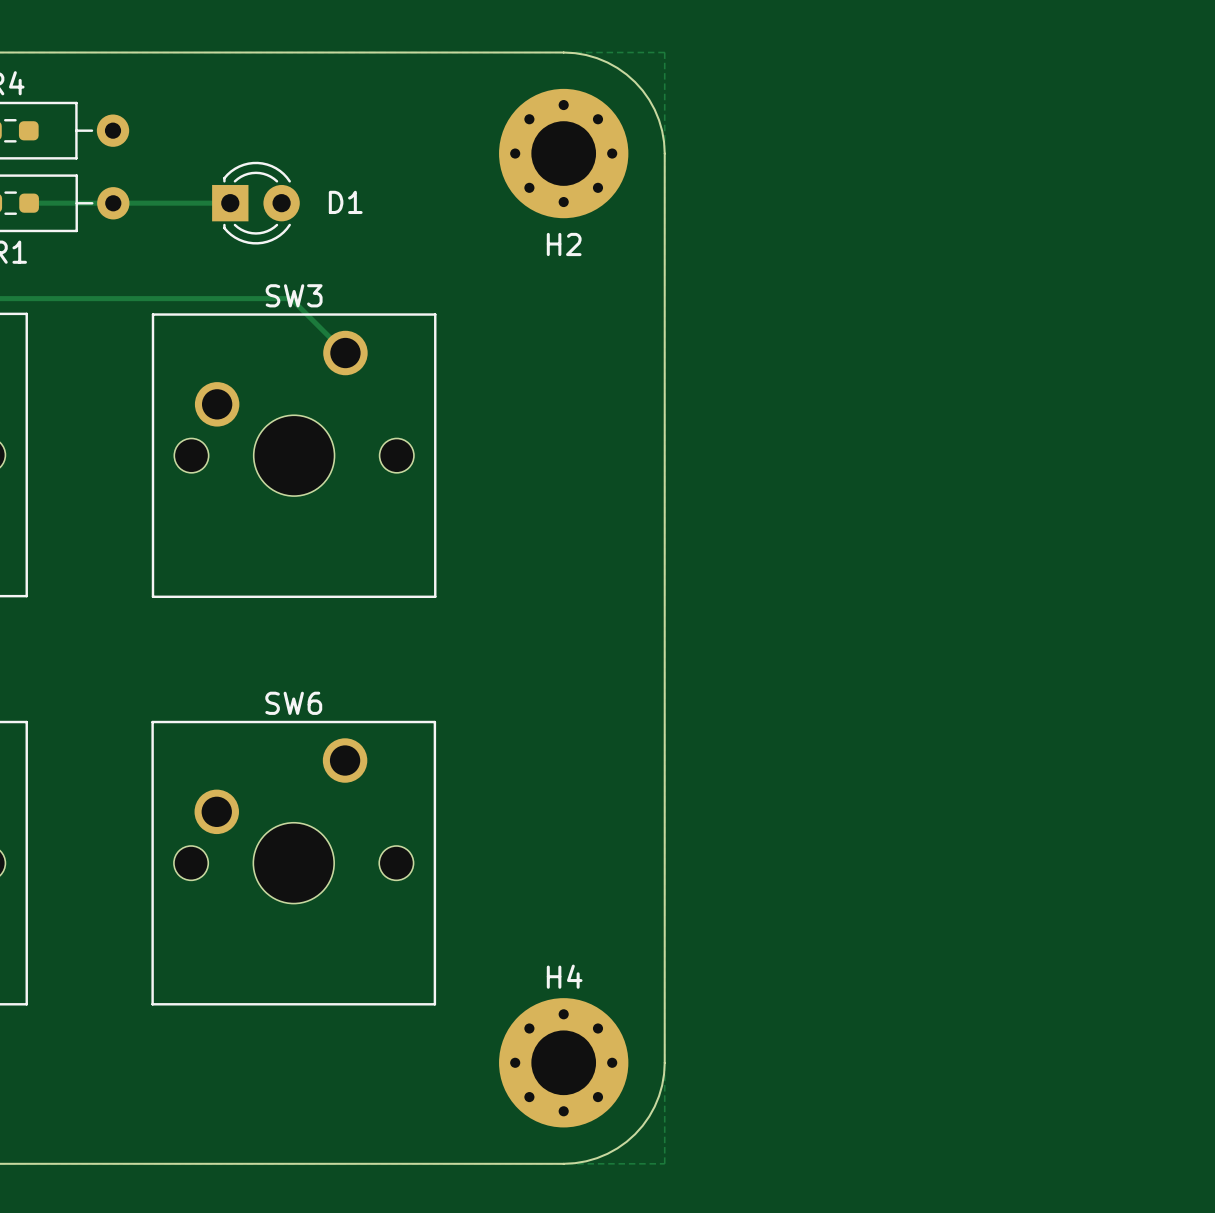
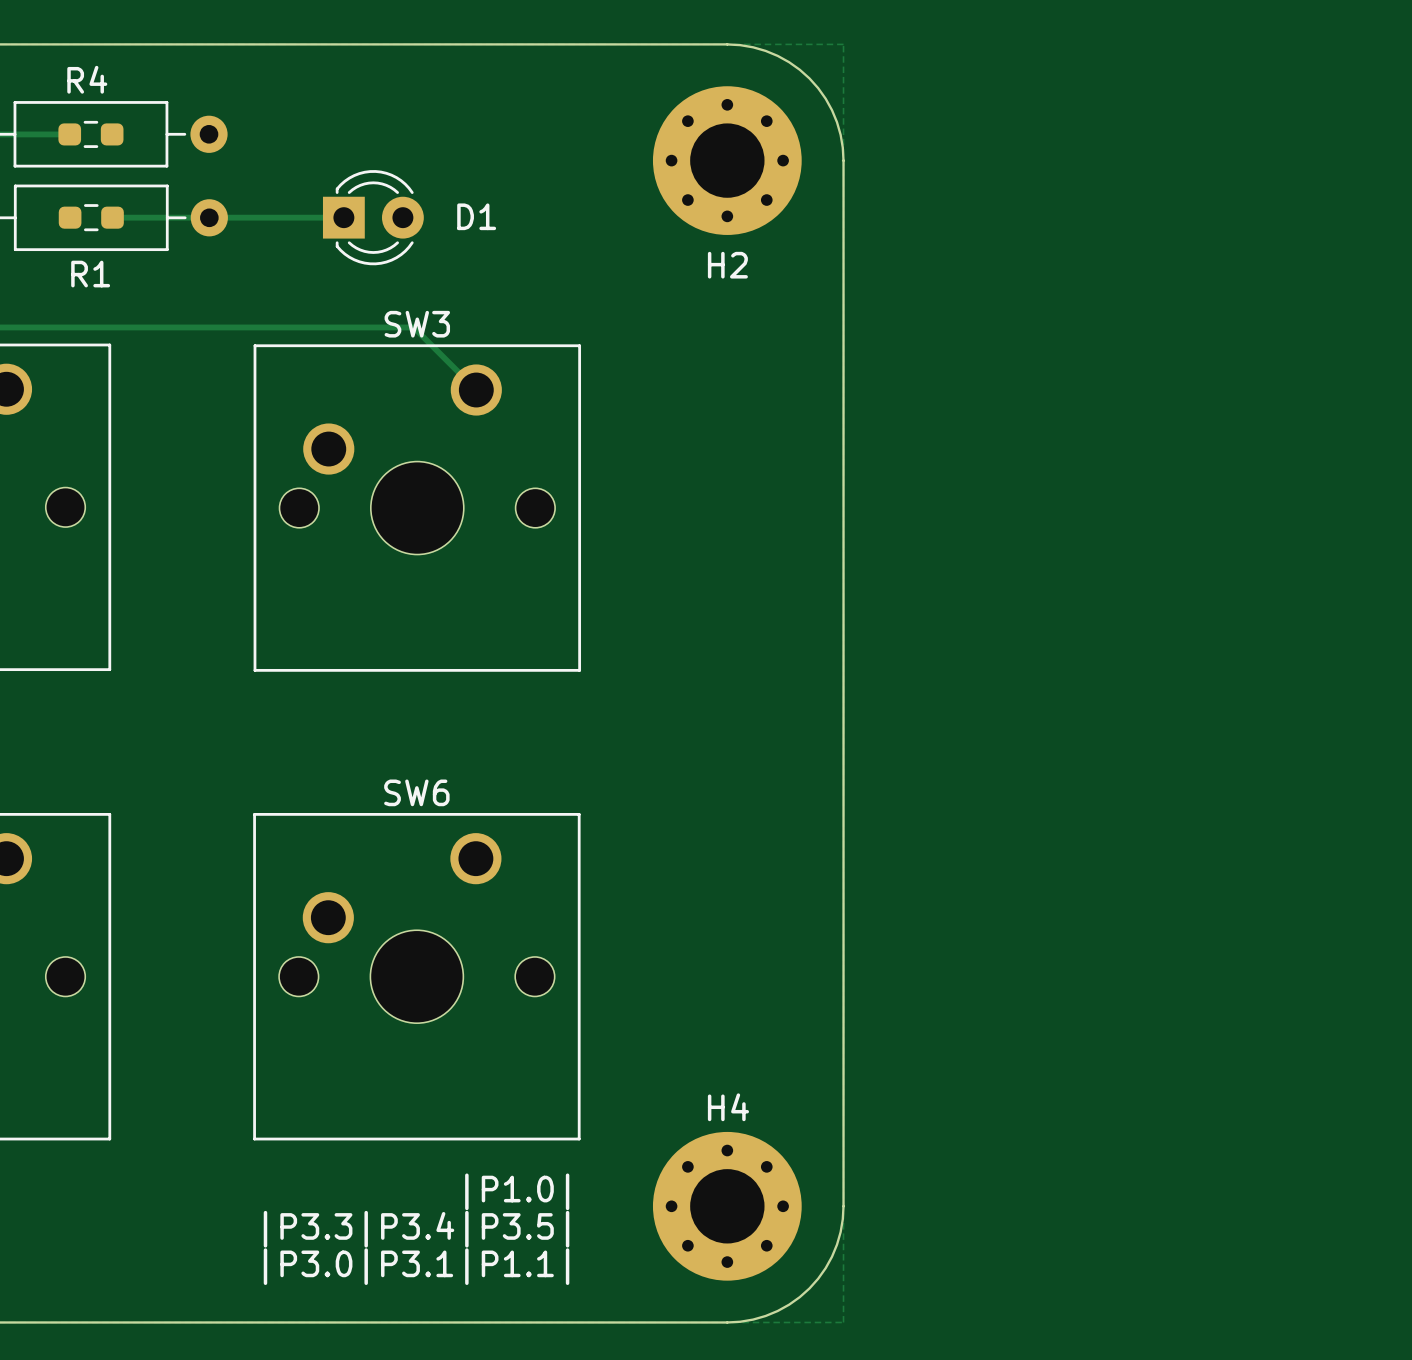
text: none -> |P1.0| (517, 1191)
text: none -> |P3.3|P3.4|P3.5| (416, 1229)
text: none -> |P3.0|P3.1|P1.1| (416, 1266)

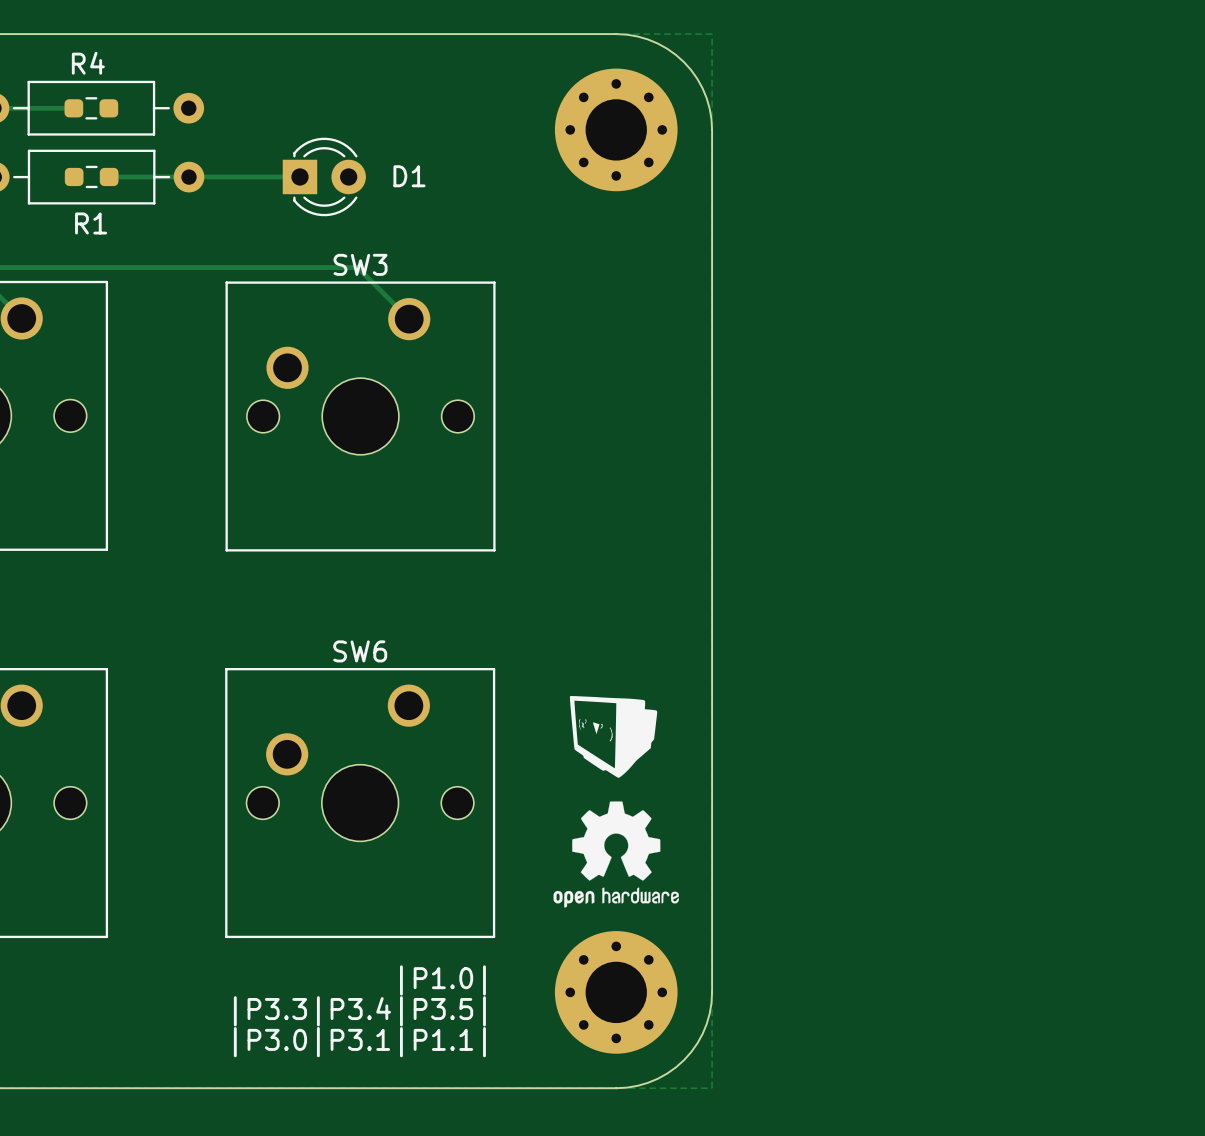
H2 name: H2 (727, 265) -> none
drawing: none -> [569, 696, 658, 778]
drawing: none -> [553, 801, 679, 908]
H4 name: H4 (728, 1107) -> none

